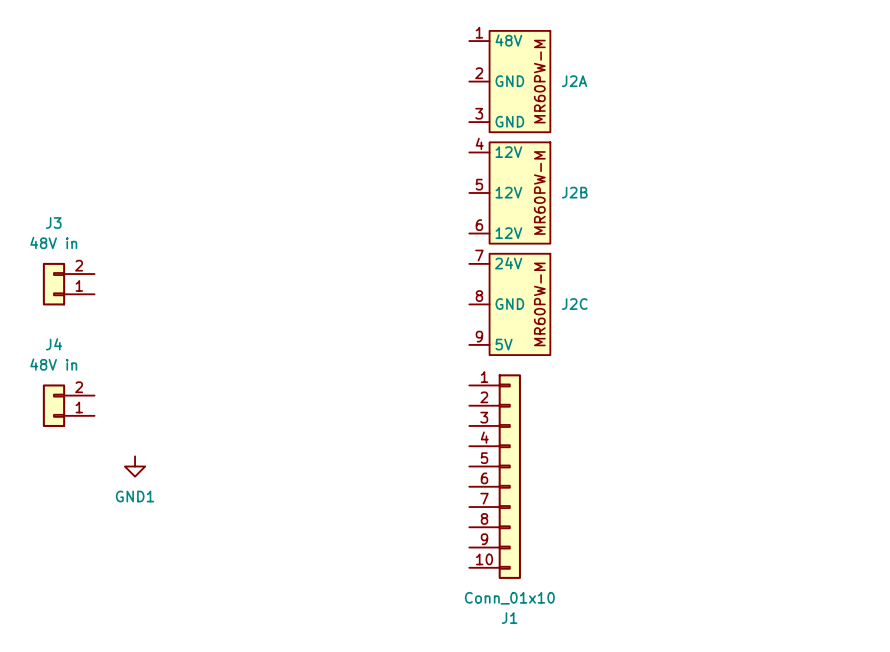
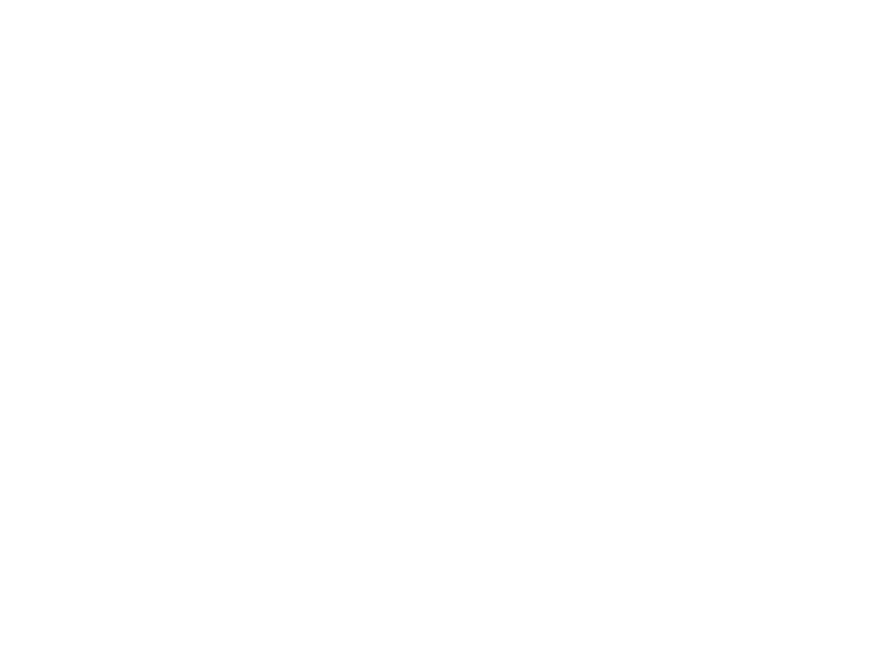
J2A: (509, 81) -> none
J2B: (509, 193) -> none
J3: 48V in (68, 284) -> none
J2C: (509, 304) -> none
J4: 48V in (68, 405) -> none
power symbol: GND1 (135, 466) -> none
J1: Conn_01x10 (495, 476) -> none

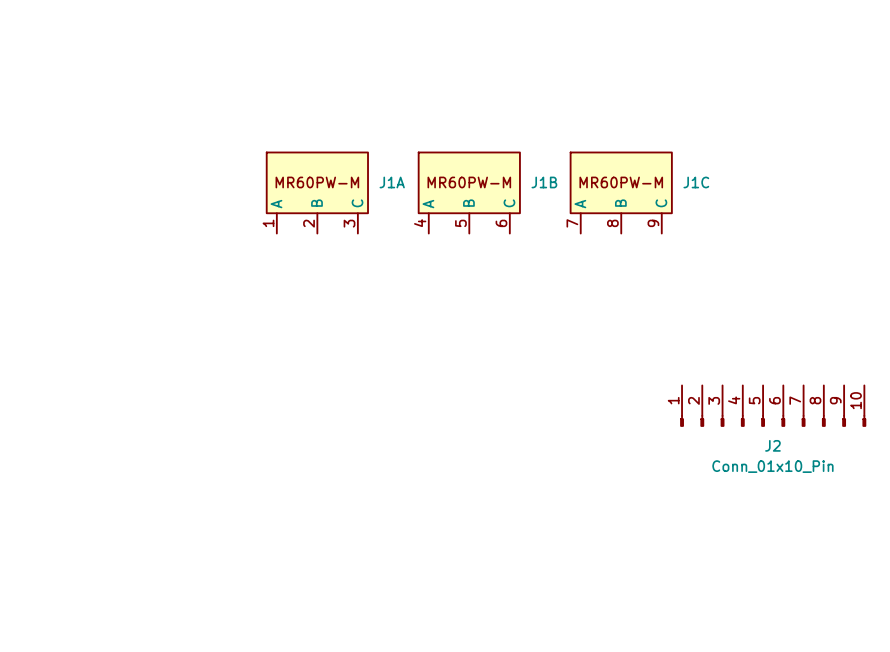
J1A: none -> (317, 193)
J1B: none -> (469, 193)
J1C: none -> (621, 193)
J2: none -> Conn_01x10_Pin (773, 406)

